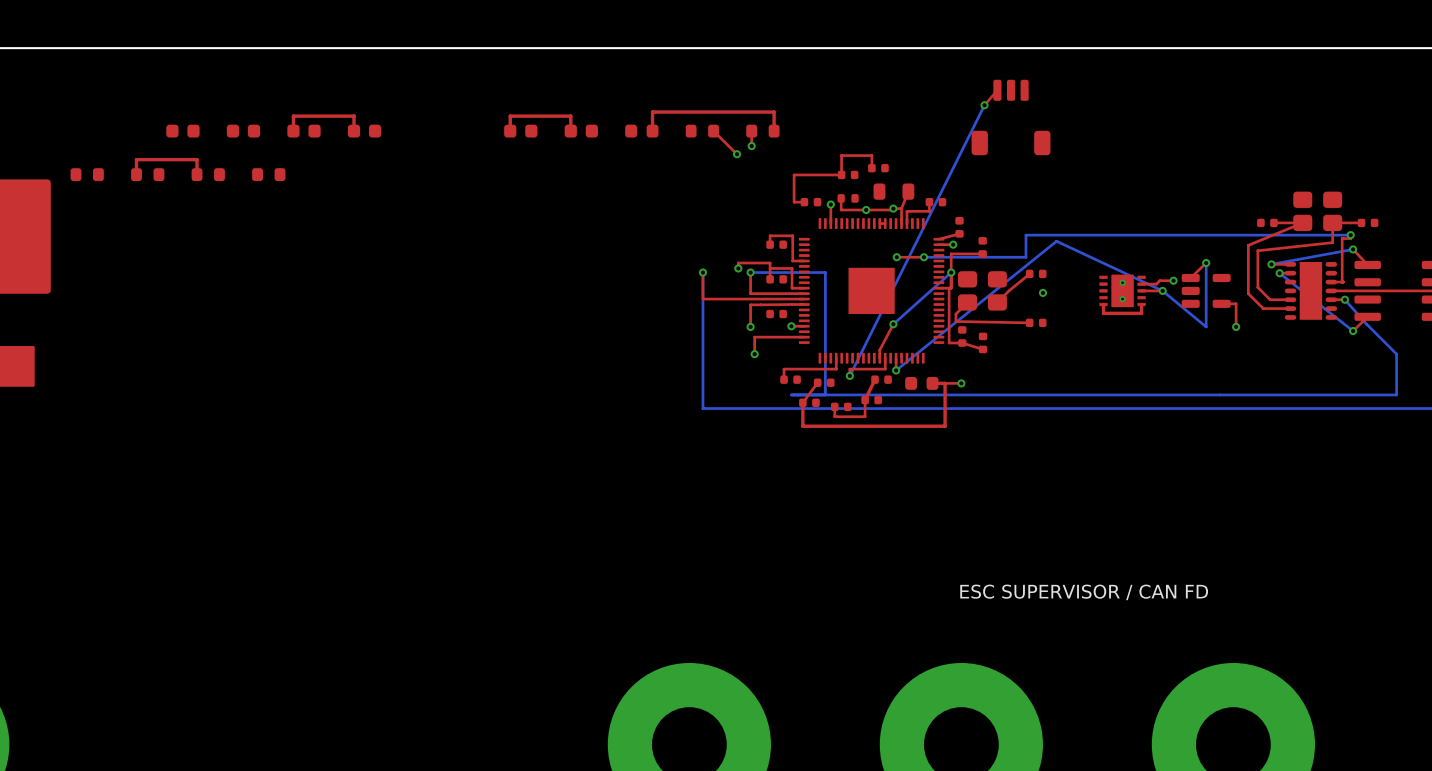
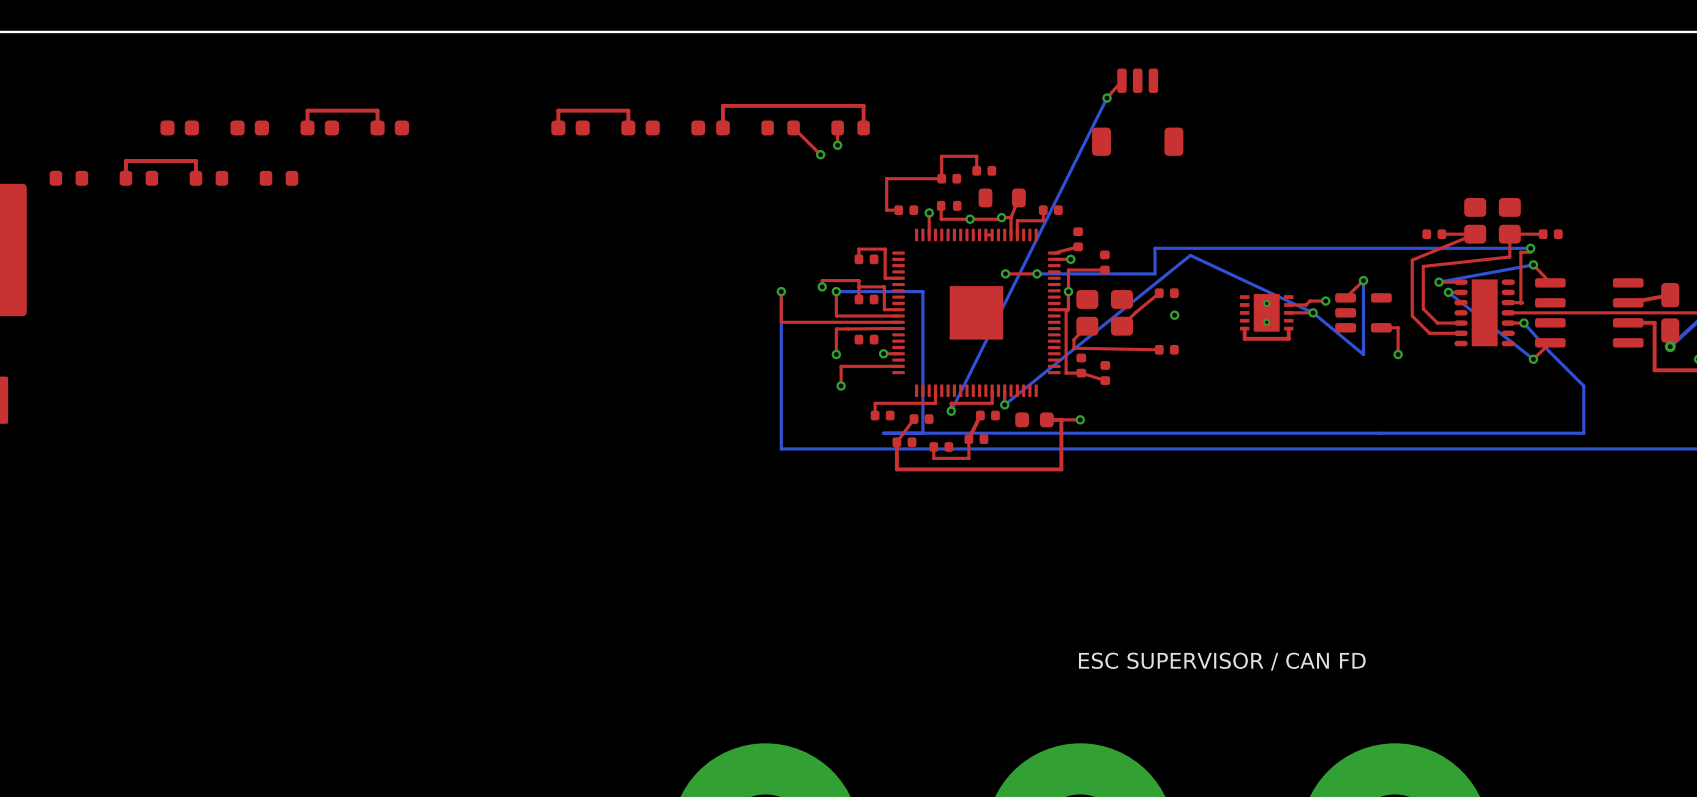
bottom track: (951, 272) (893, 324) -> none
top track: (893, 324) (879, 350) (879, 358) -> none
via: (893, 324) -> none

